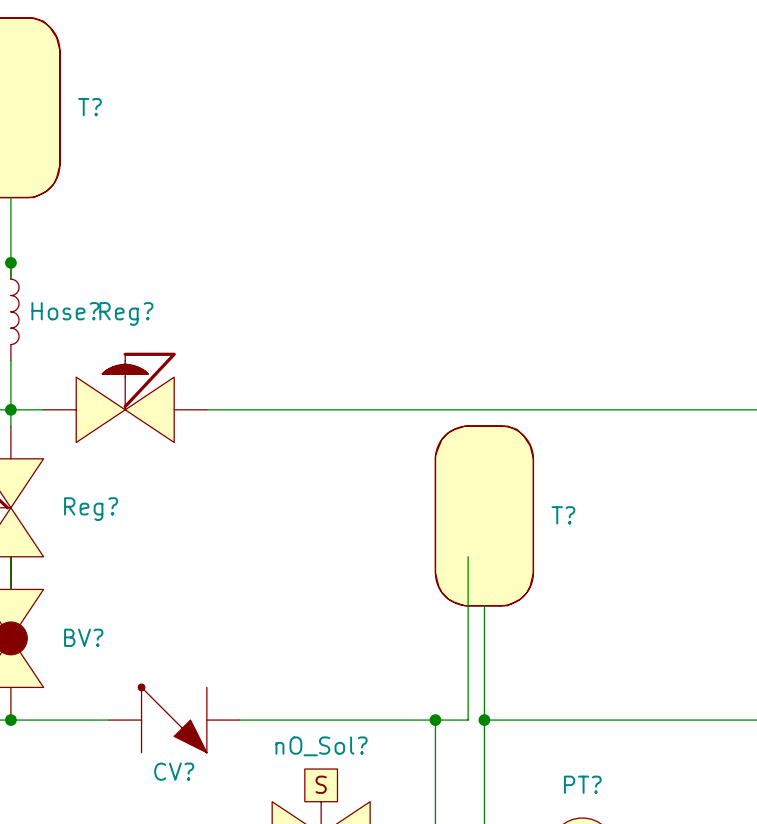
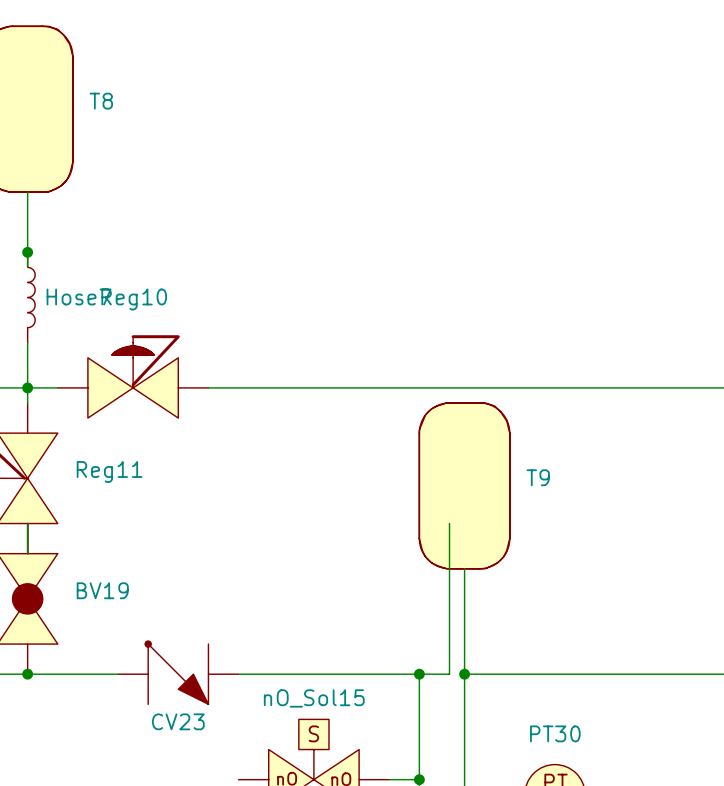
T? name: T? (89, 107) -> T8 (101, 101)
Hose? name: Hose? (65, 311) -> Hose7 (79, 296)
Reg? name: Reg? (126, 313) -> Reg10 (134, 299)
Reg? name: Reg? (91, 509) -> Reg11 (109, 472)
T? name: T? (563, 515) -> T9 (538, 477)
BV? name: BV? (83, 637) -> BV19 (102, 590)
nO_Sol? name: nO_Sol? (321, 746) -> nO_Sol15 (314, 698)
CV? name: CV? (174, 771) -> CV23 (178, 721)
PT? name: PT? (582, 784) -> PT30 (555, 733)

